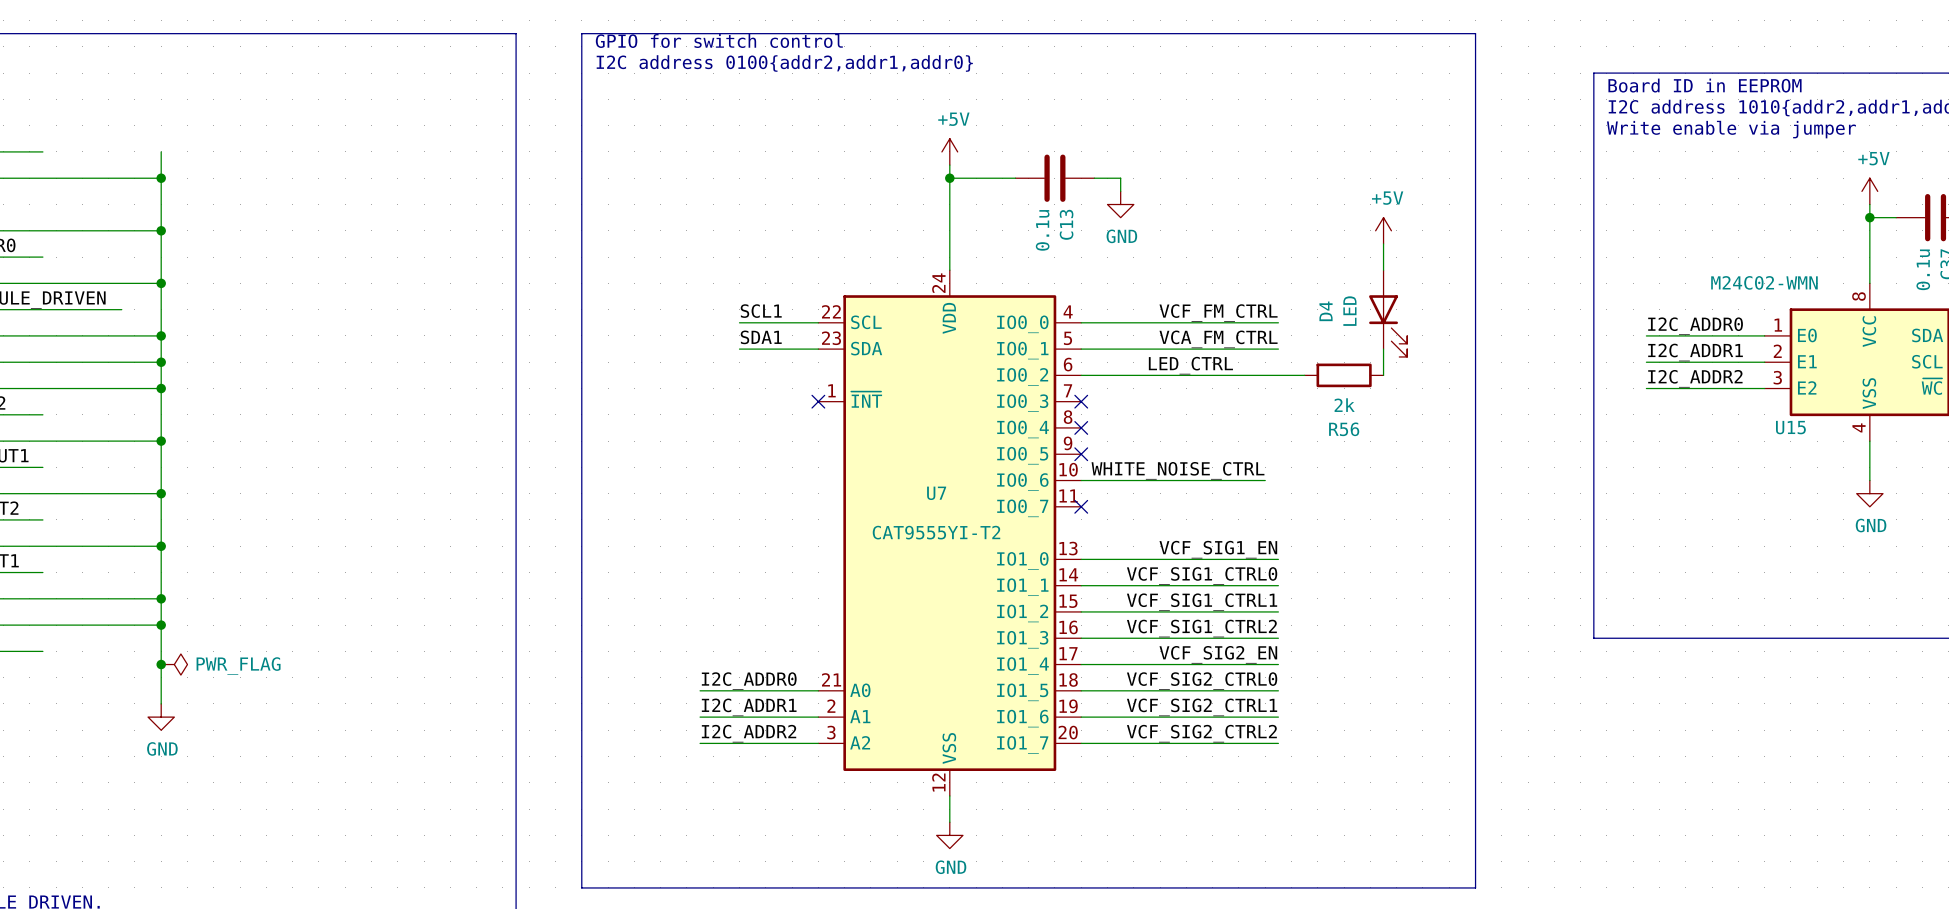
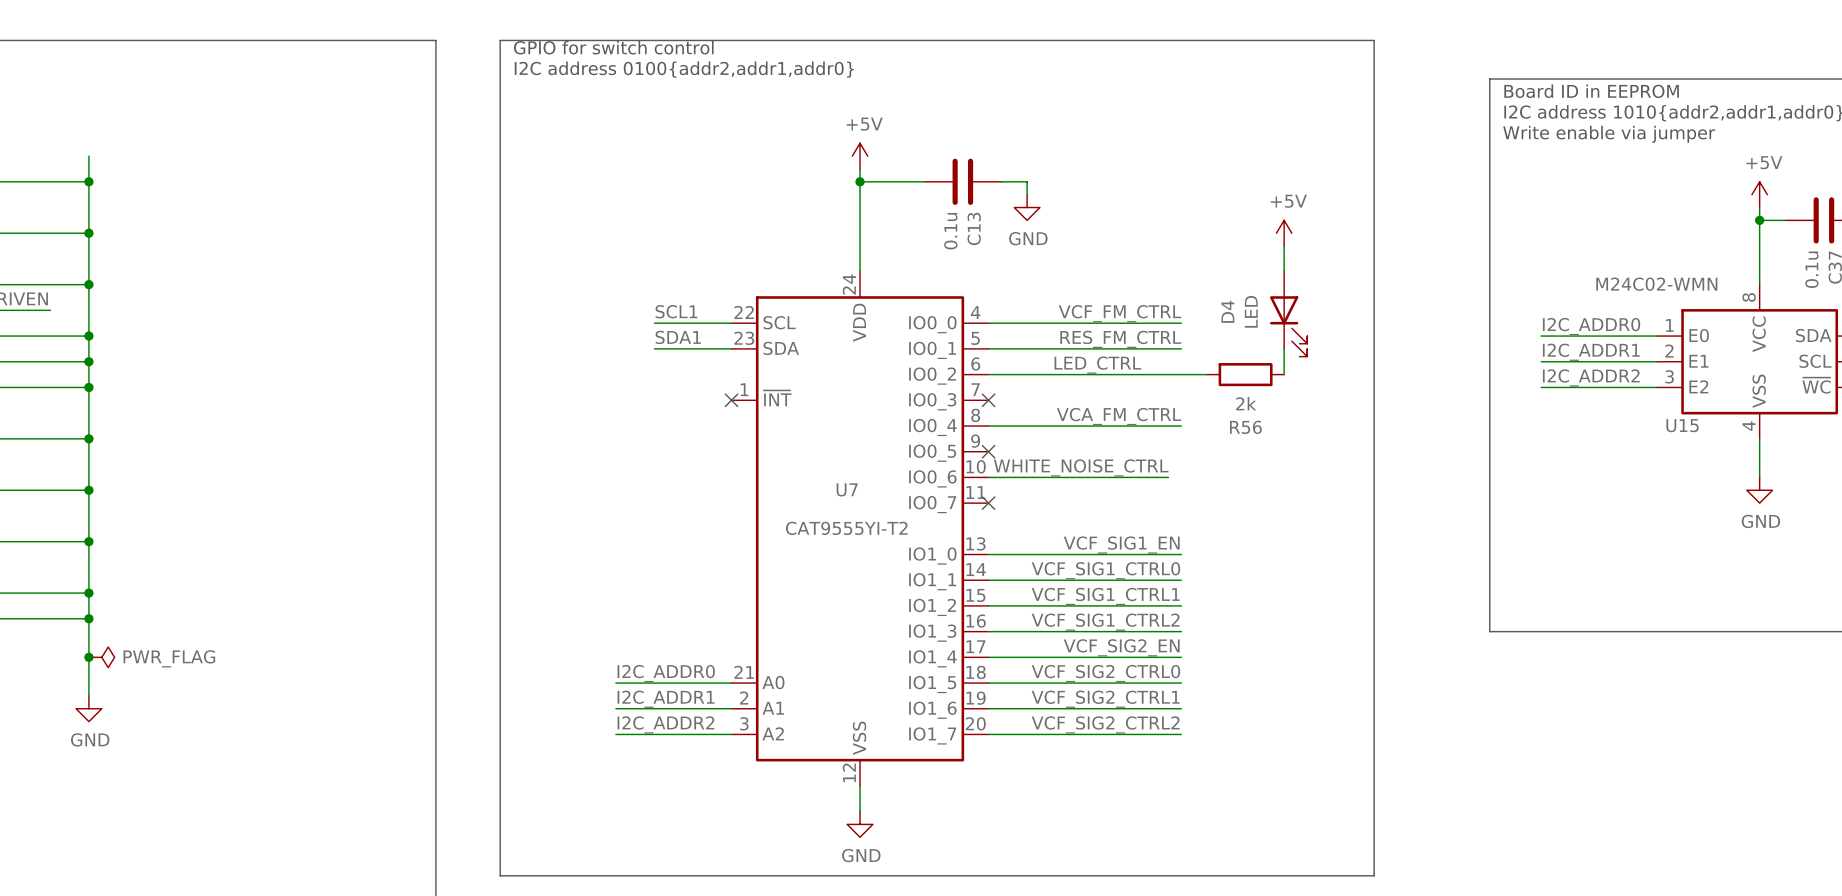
label: VCA_FM_CTRL (1218, 339) -> RES_FM_CTRL (1120, 339)
label: none -> VCA_FM_CTRL (1119, 416)
wire: none -> (988, 426) (1181, 426)
no-connect mark: (1081, 427) -> none

